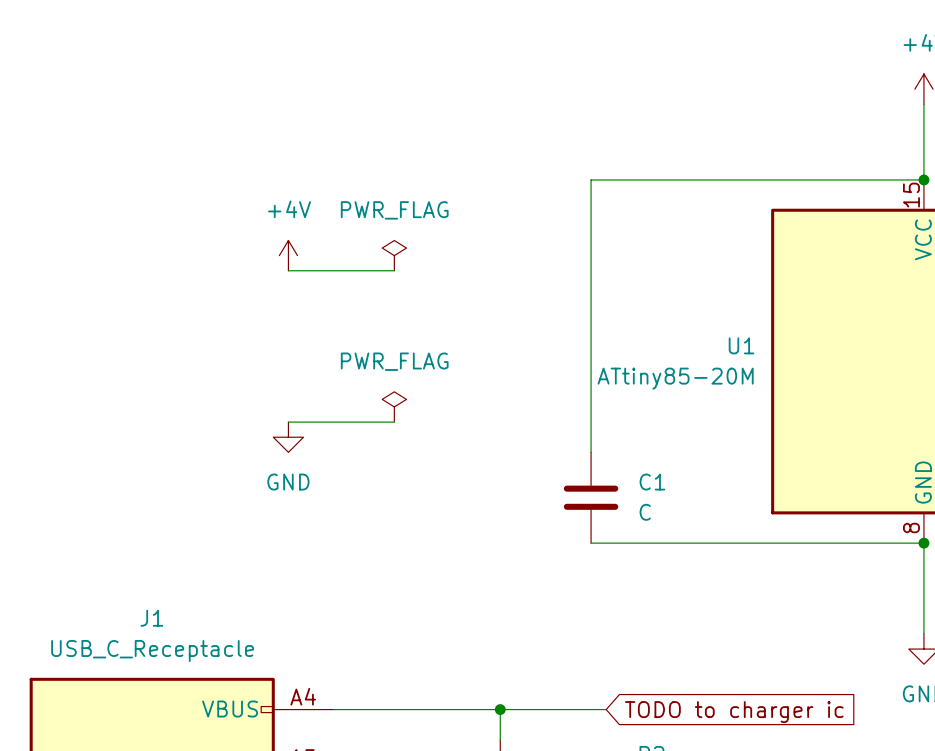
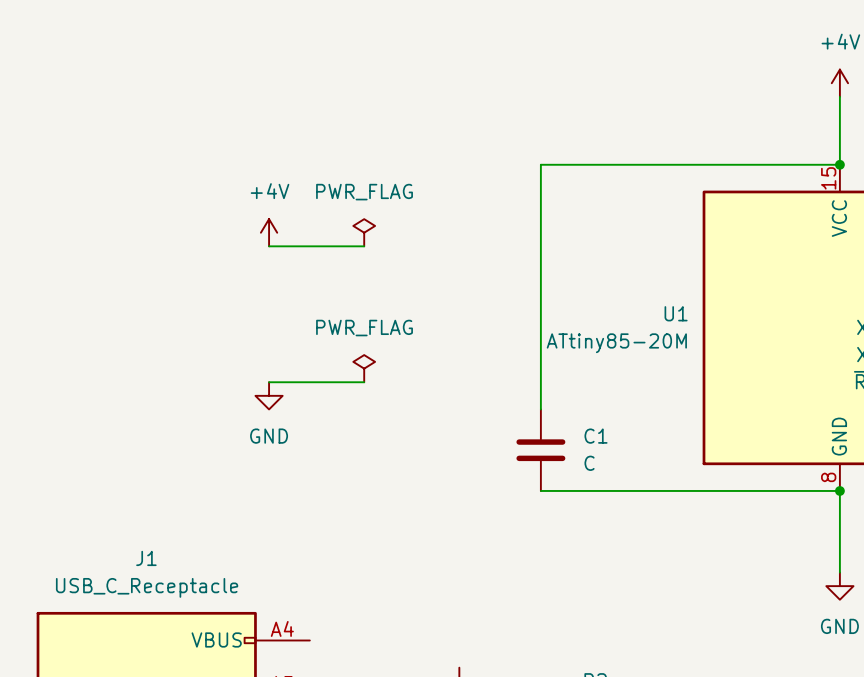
wire: (333, 709) (606, 709) -> none
wire: (500, 709) (500, 739) -> none
junction: (500, 709) -> none
global label: TODO to charger ic (734, 712) -> none

